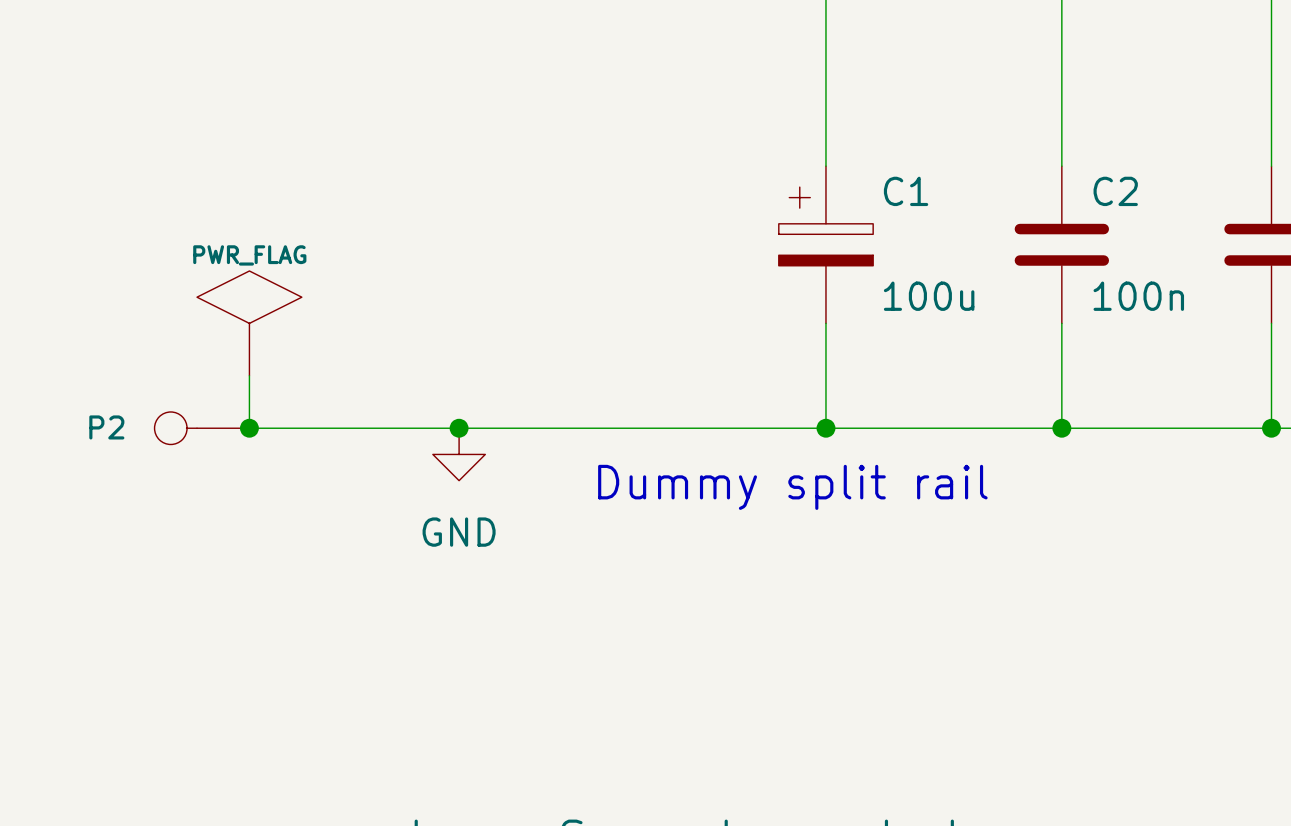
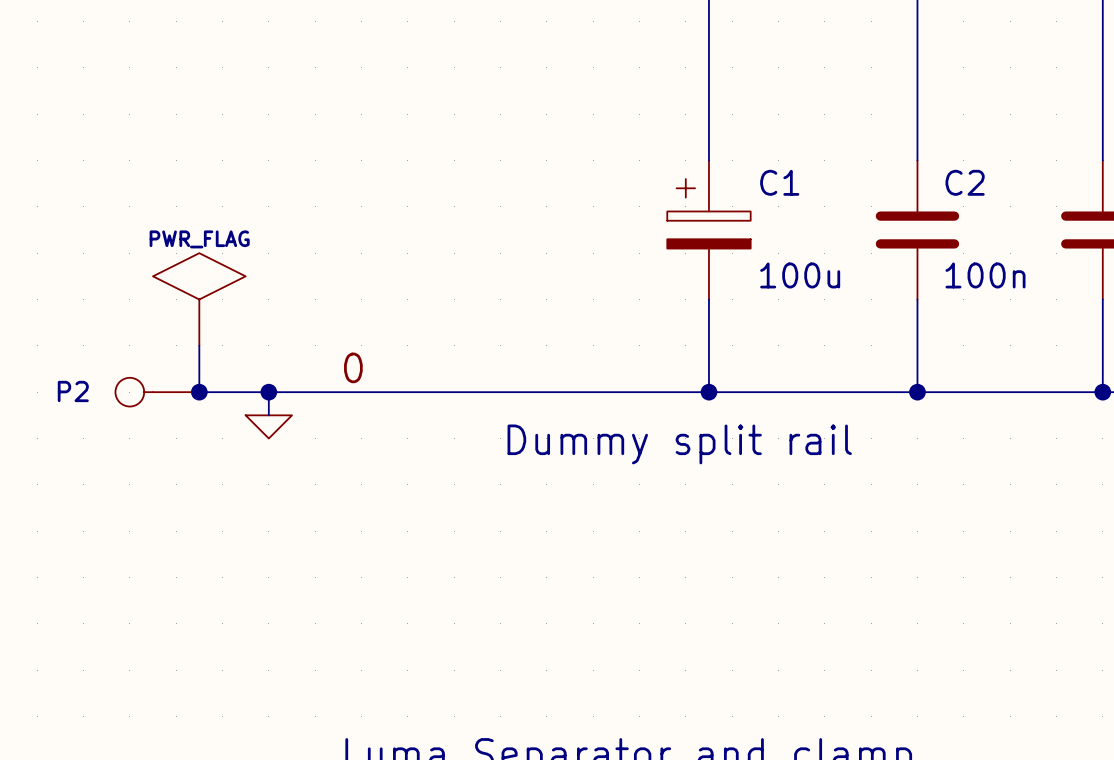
label: none -> 0 (353, 367)
wire: none -> (268, 392) (268, 415)
junction: none -> (268, 392)
junction: (459, 428) -> none
power symbol: GND (459, 454) -> none
power symbol: none -> (268, 426)

